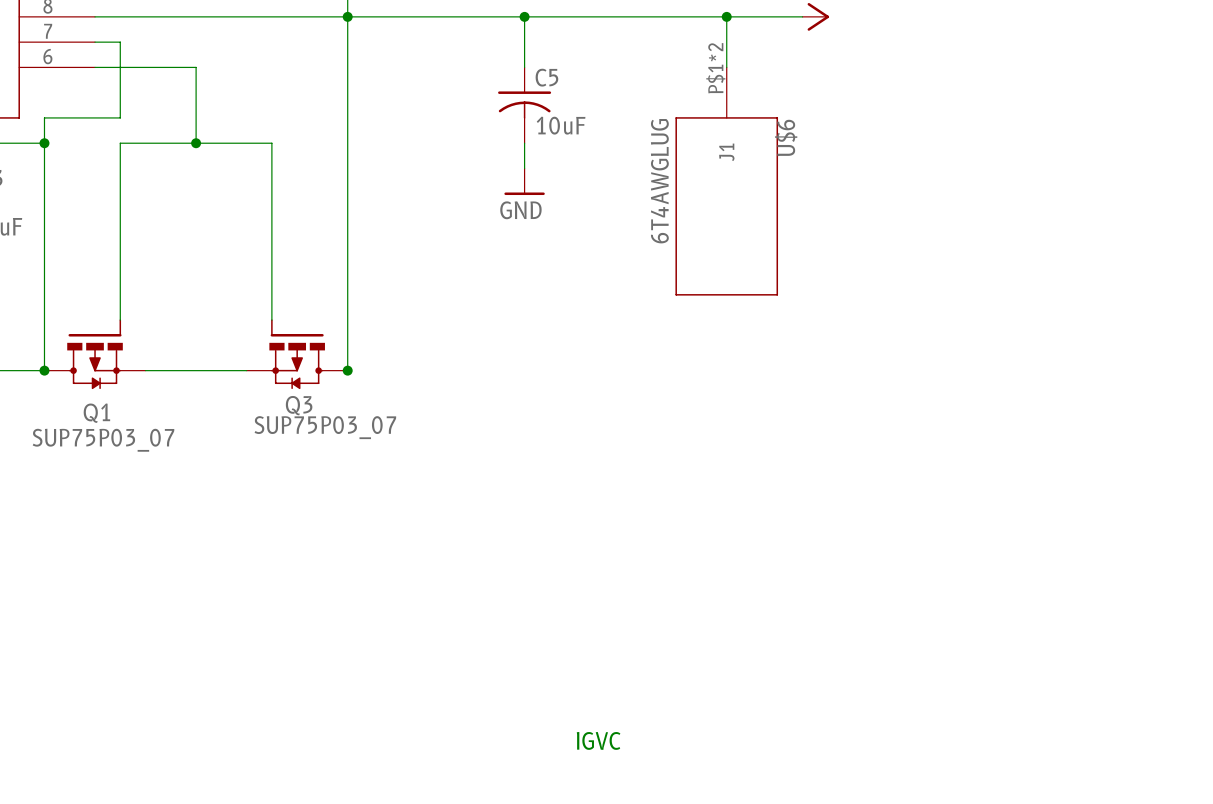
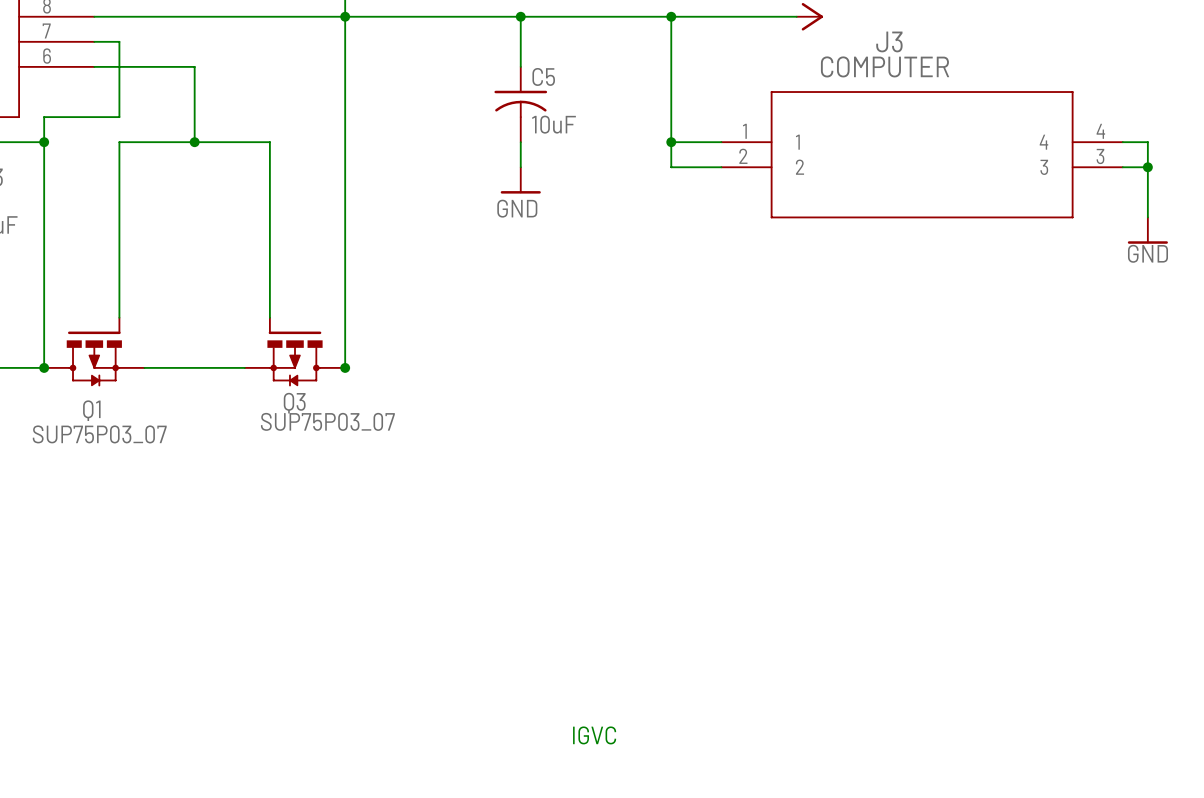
wire: none -> (671, 16) (671, 167) (721, 167)
wire: (726, 16) (726, 67) -> none
junction position: (726, 16) -> (671, 16)
wire: none -> (671, 142) (721, 142)
junction: none -> (671, 142)
wire: none -> (1122, 142) (1147, 142) (1147, 217)
J3: none -> COMPUTER (922, 154)
wire: none -> (1122, 167) (1147, 167)
junction: none -> (1147, 167)
U$6: 6T4AWGLUG (726, 181) -> none
power symbol: none -> GND (1147, 230)

